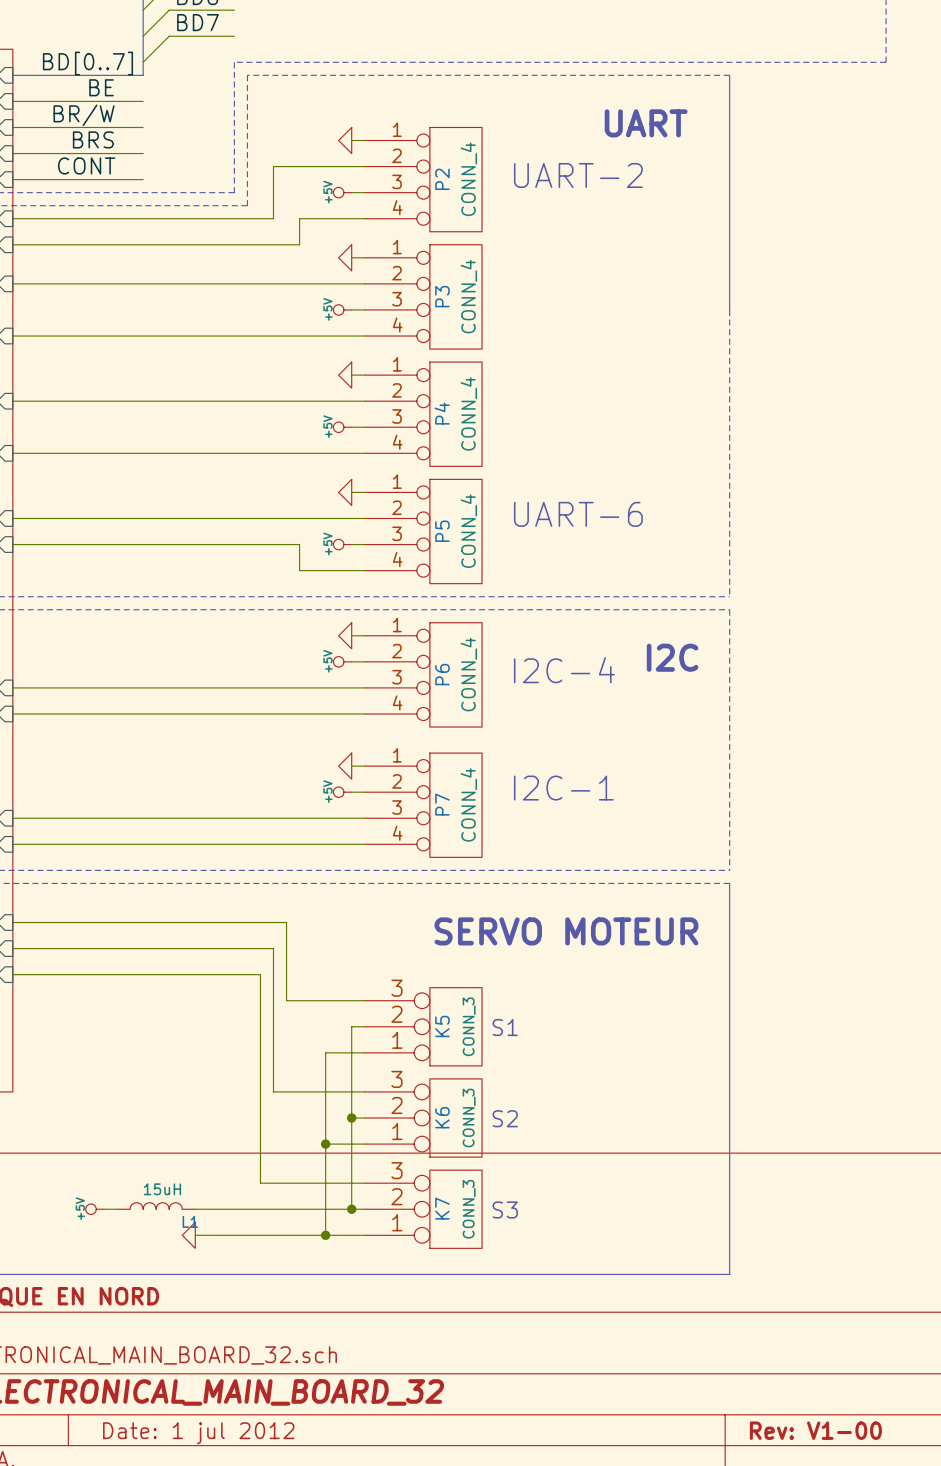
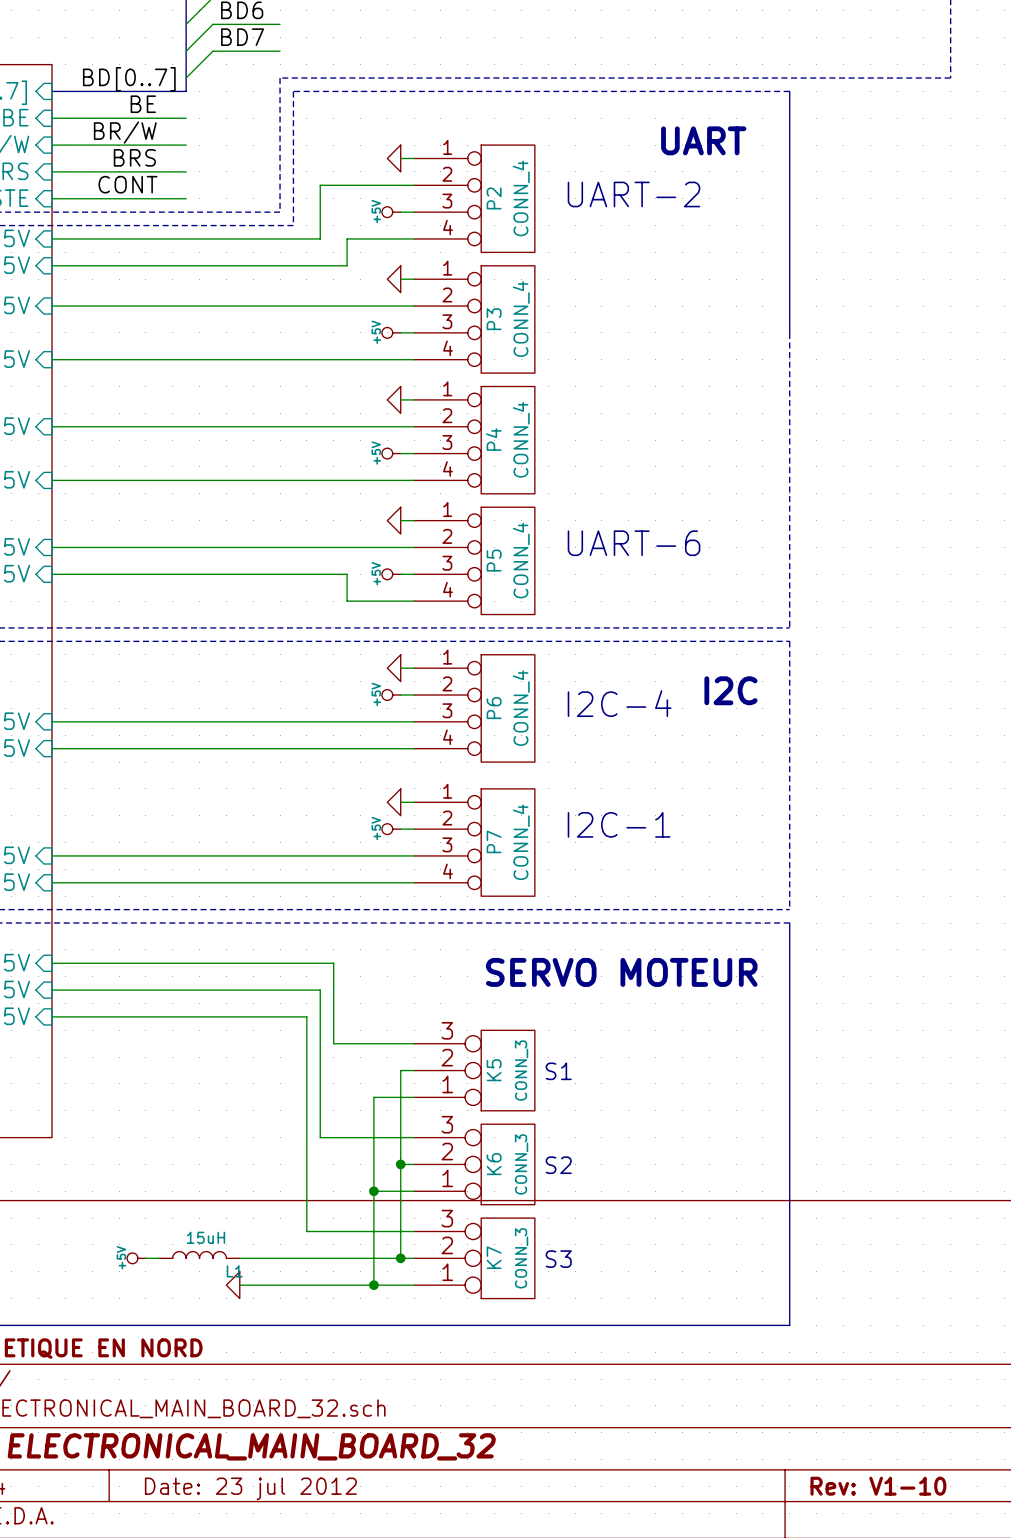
title block: Rev: V1-00 (815, 1430) -> Rev: V1-10 (878, 1486)
title block: Date: 1 jul 2012 (198, 1433) -> Date: 23 jul 2012 (250, 1488)

